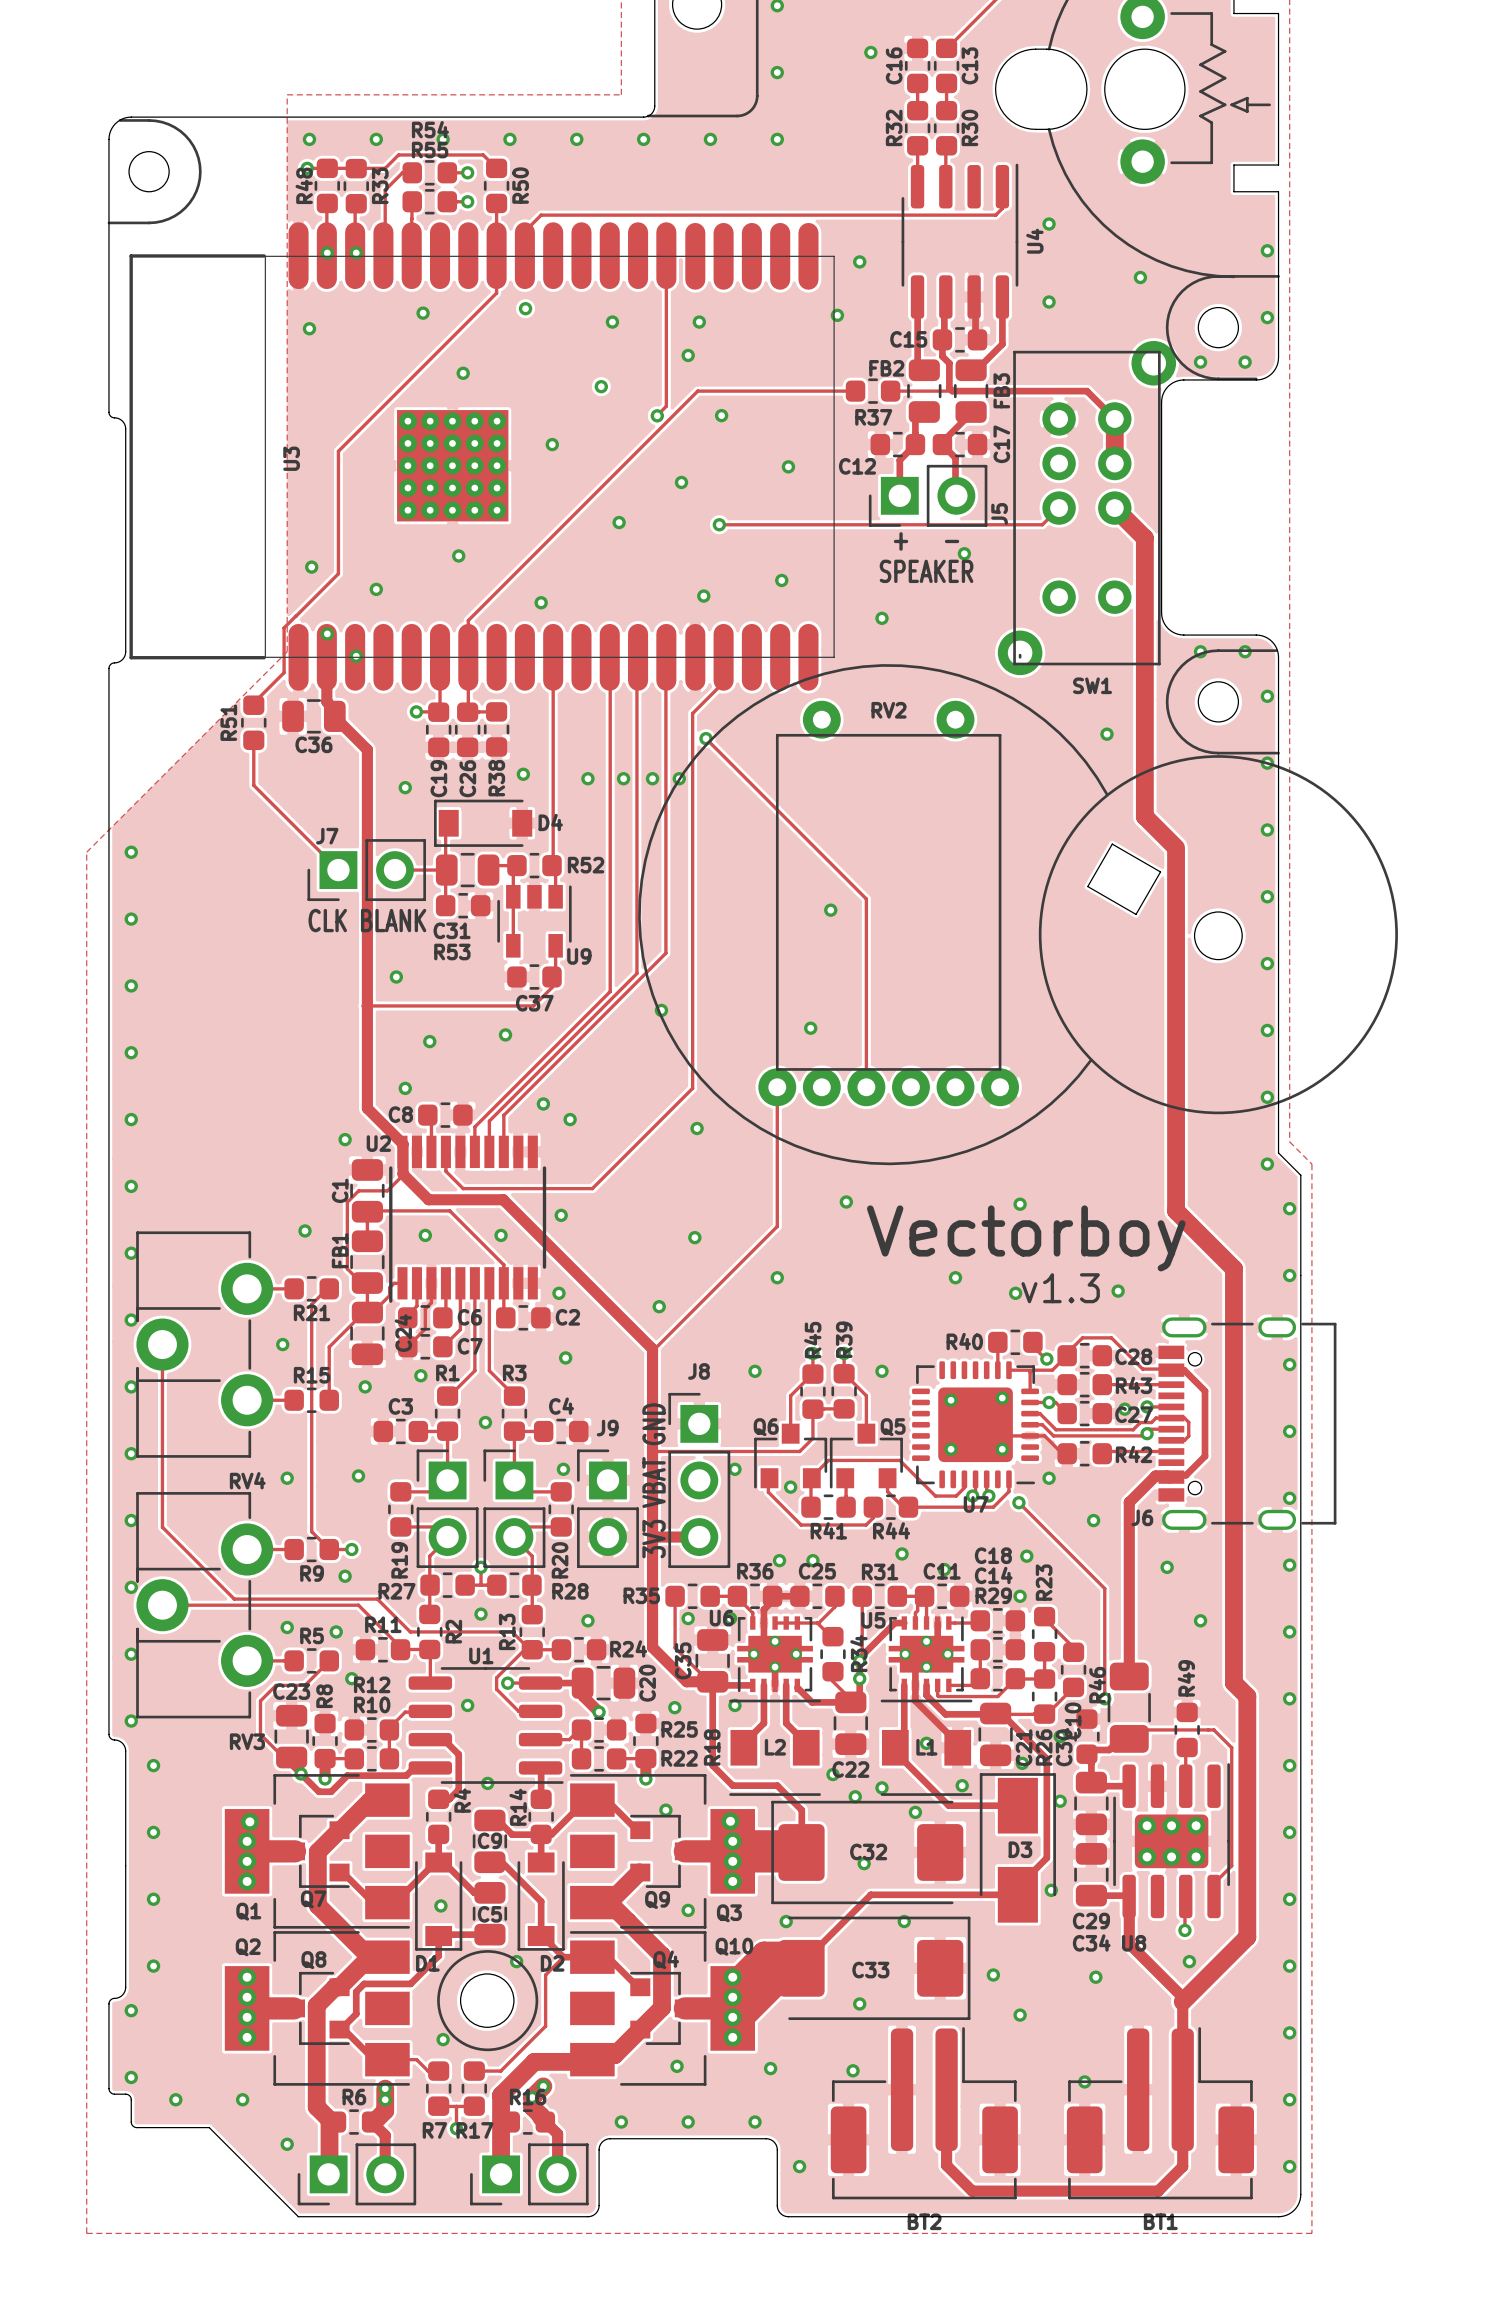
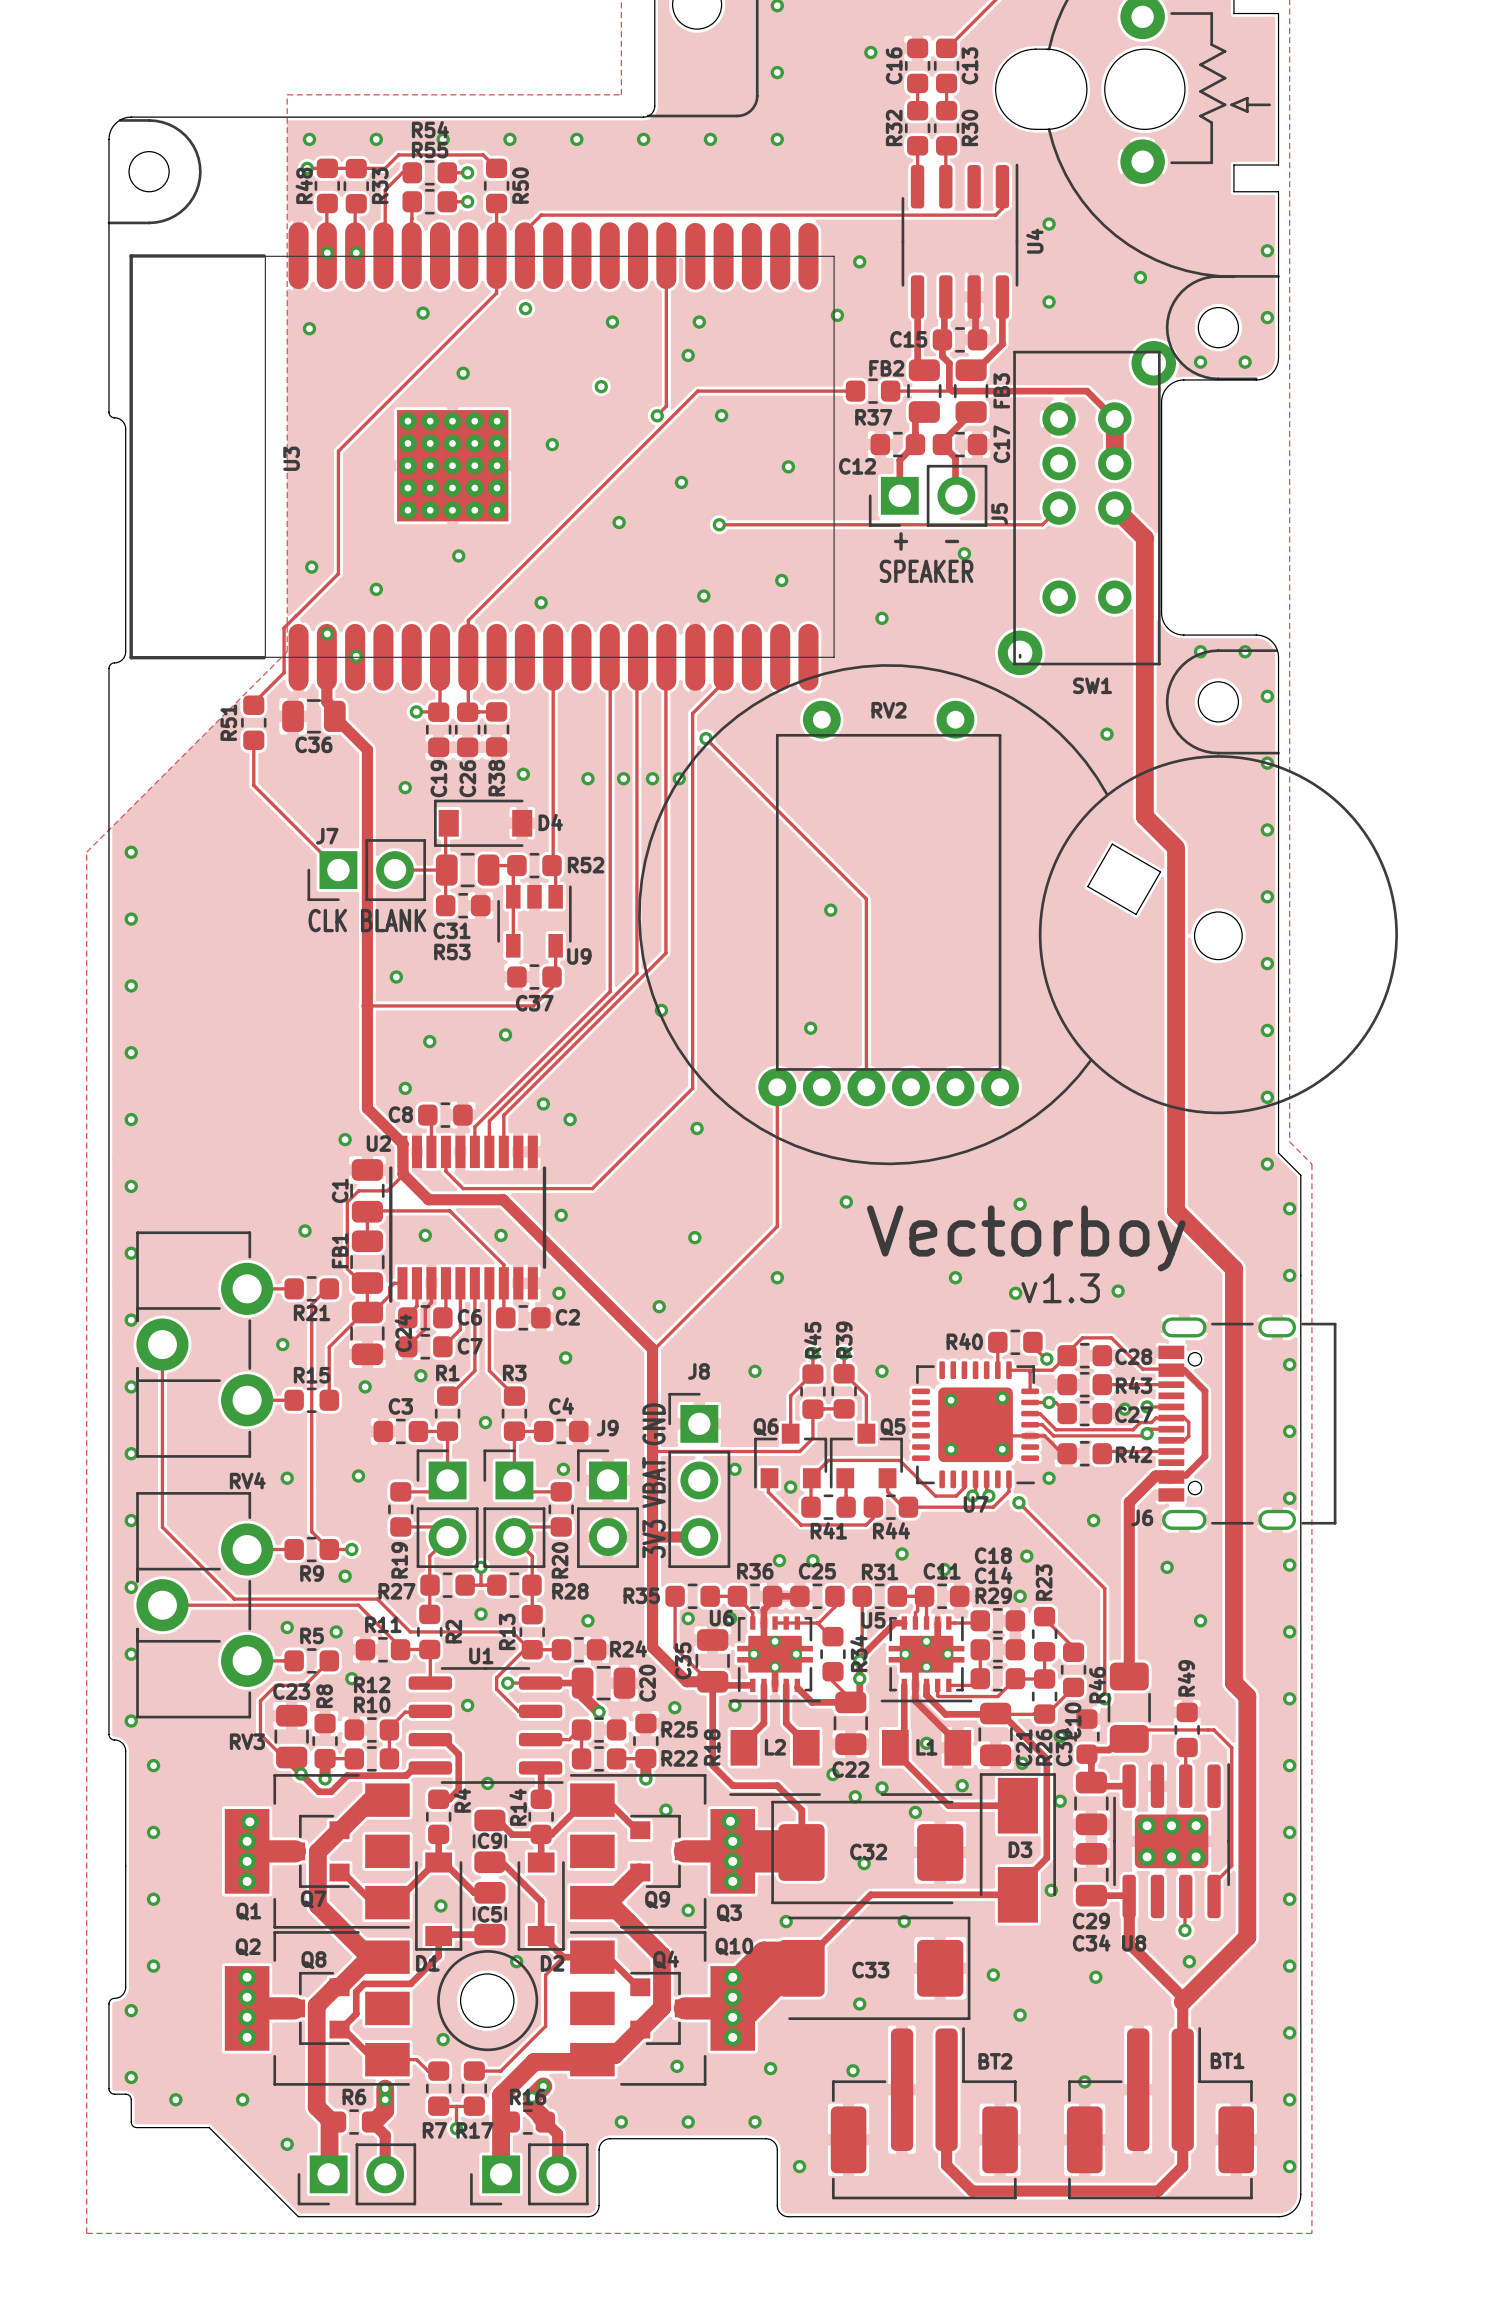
BT2 name position: BT2 (924, 2221) -> BT2 (995, 2061)
BT1 name position: BT1 (1160, 2221) -> BT1 (1227, 2060)

